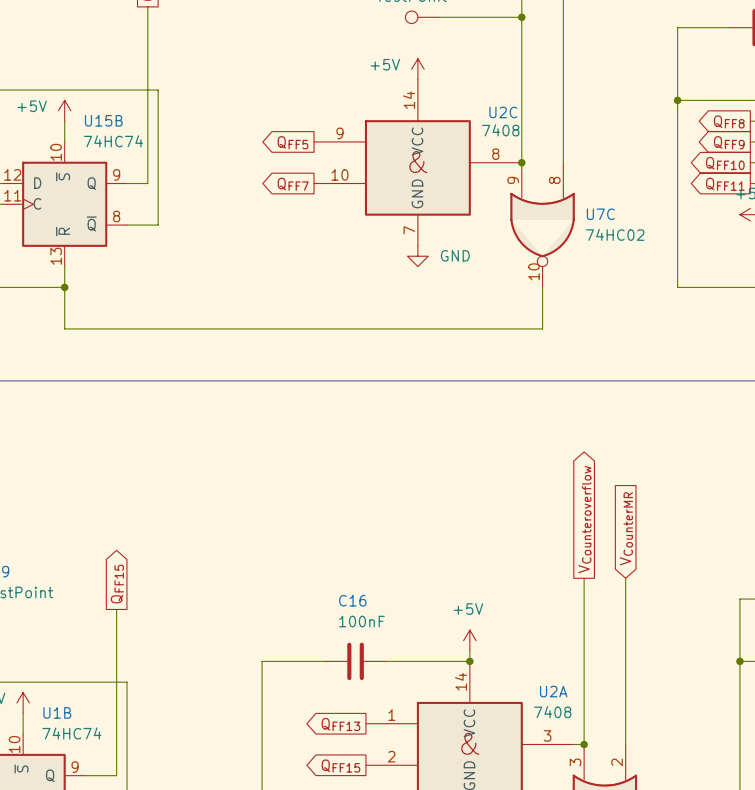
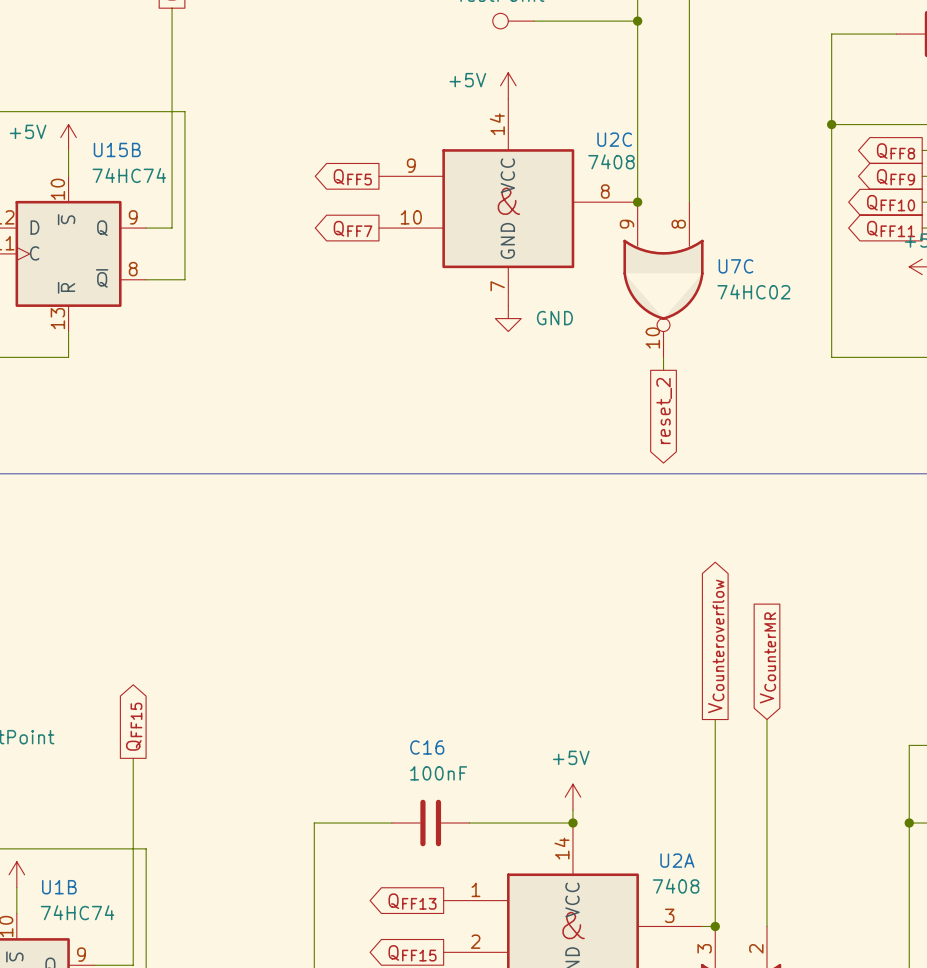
wire: (64, 287) (64, 328) (542, 328) (542, 297) -> none
junction: (64, 287) -> none
global label: none -> reset_2 (664, 410)

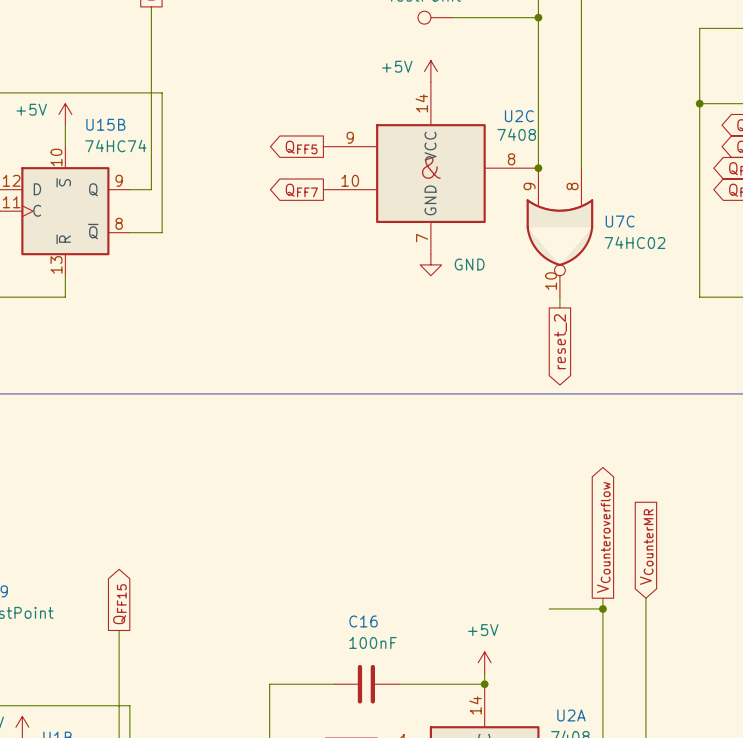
wire: none -> (549, 608) (602, 608)
junction: none -> (602, 608)

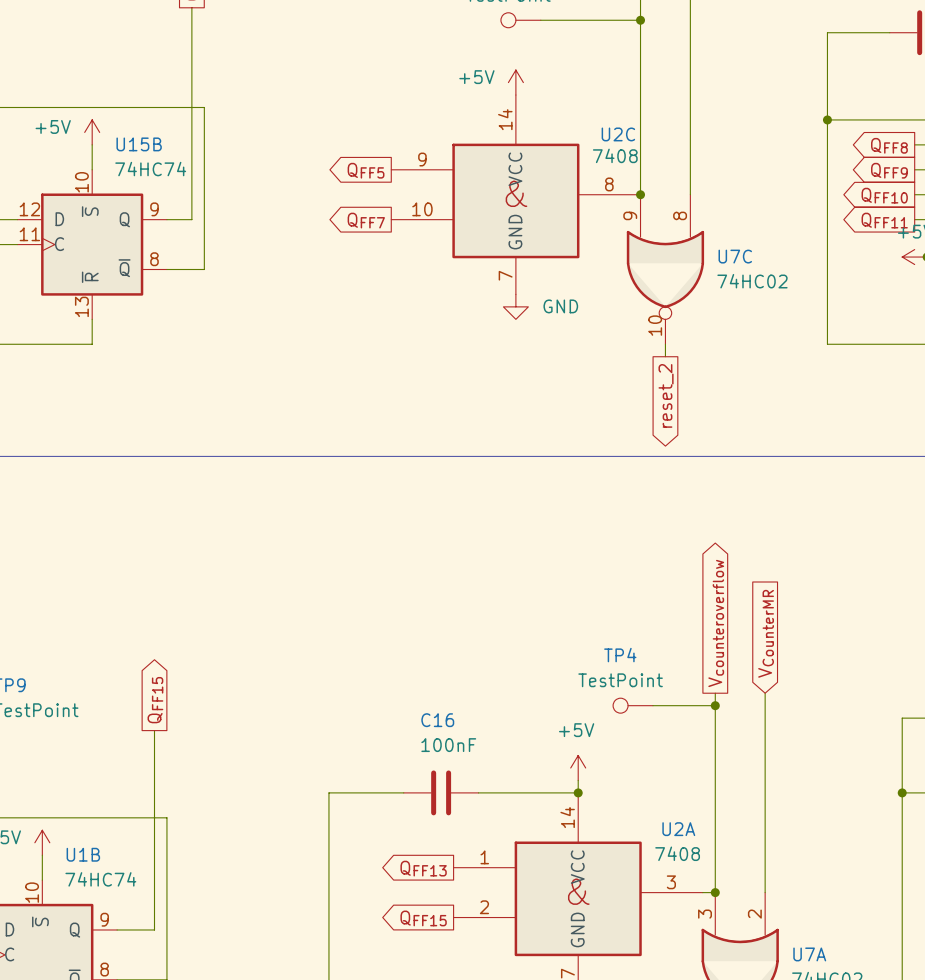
global label: VCounteroverflow (603, 537) -> Vcounteroverflow (716, 623)
TP4: none -> TestPoint (633, 705)

